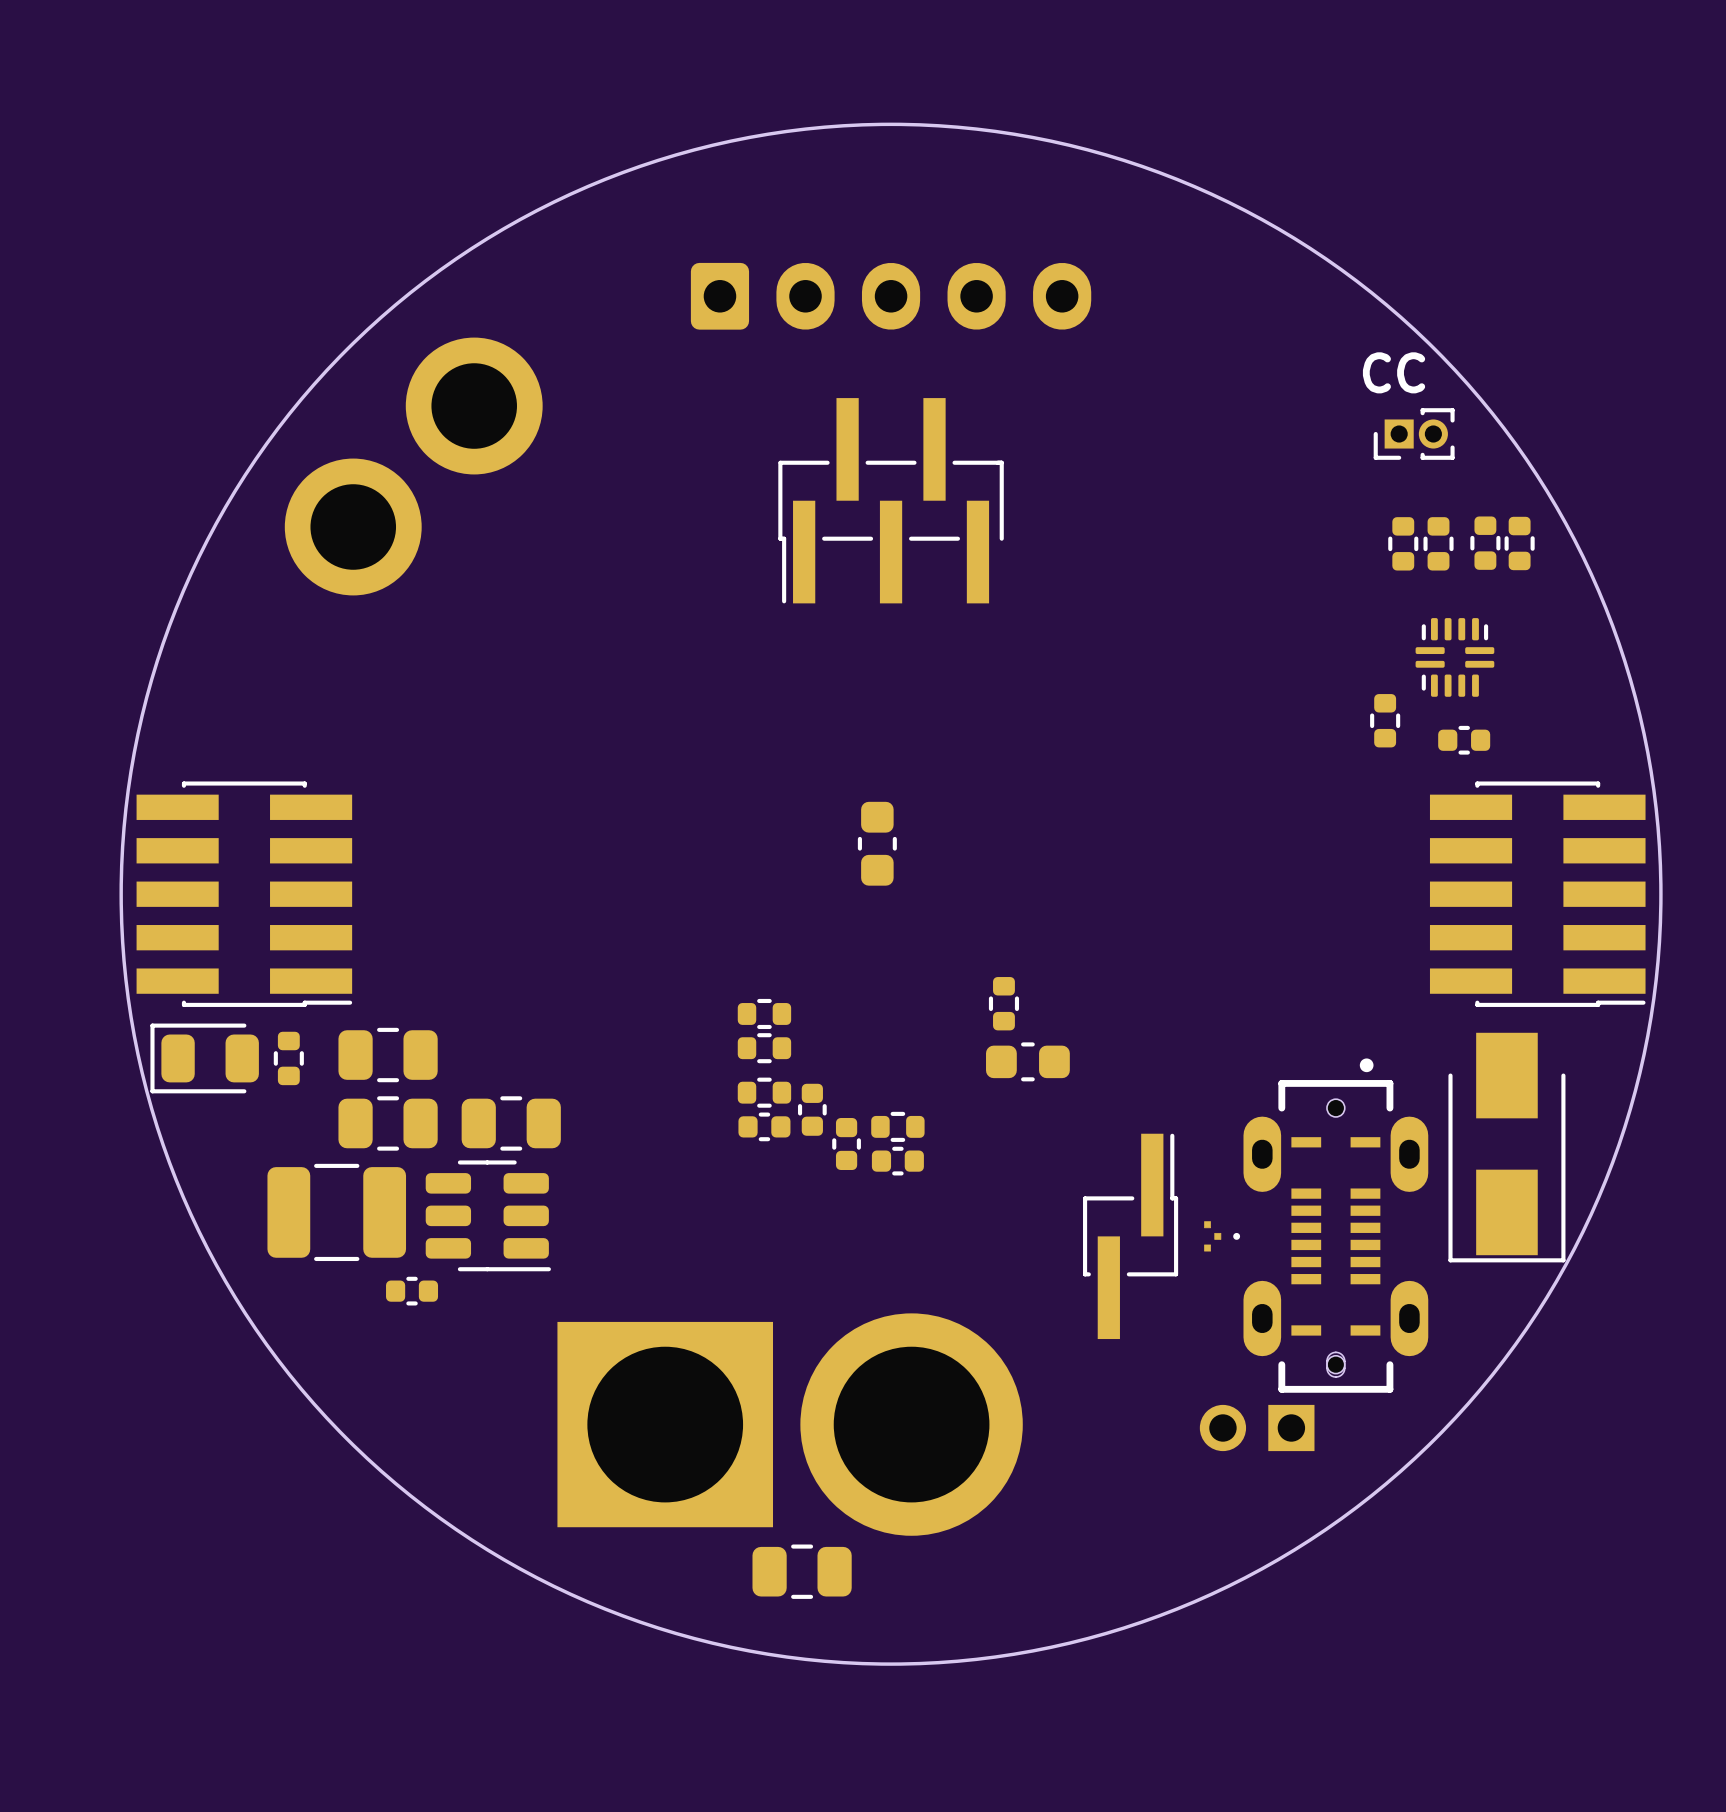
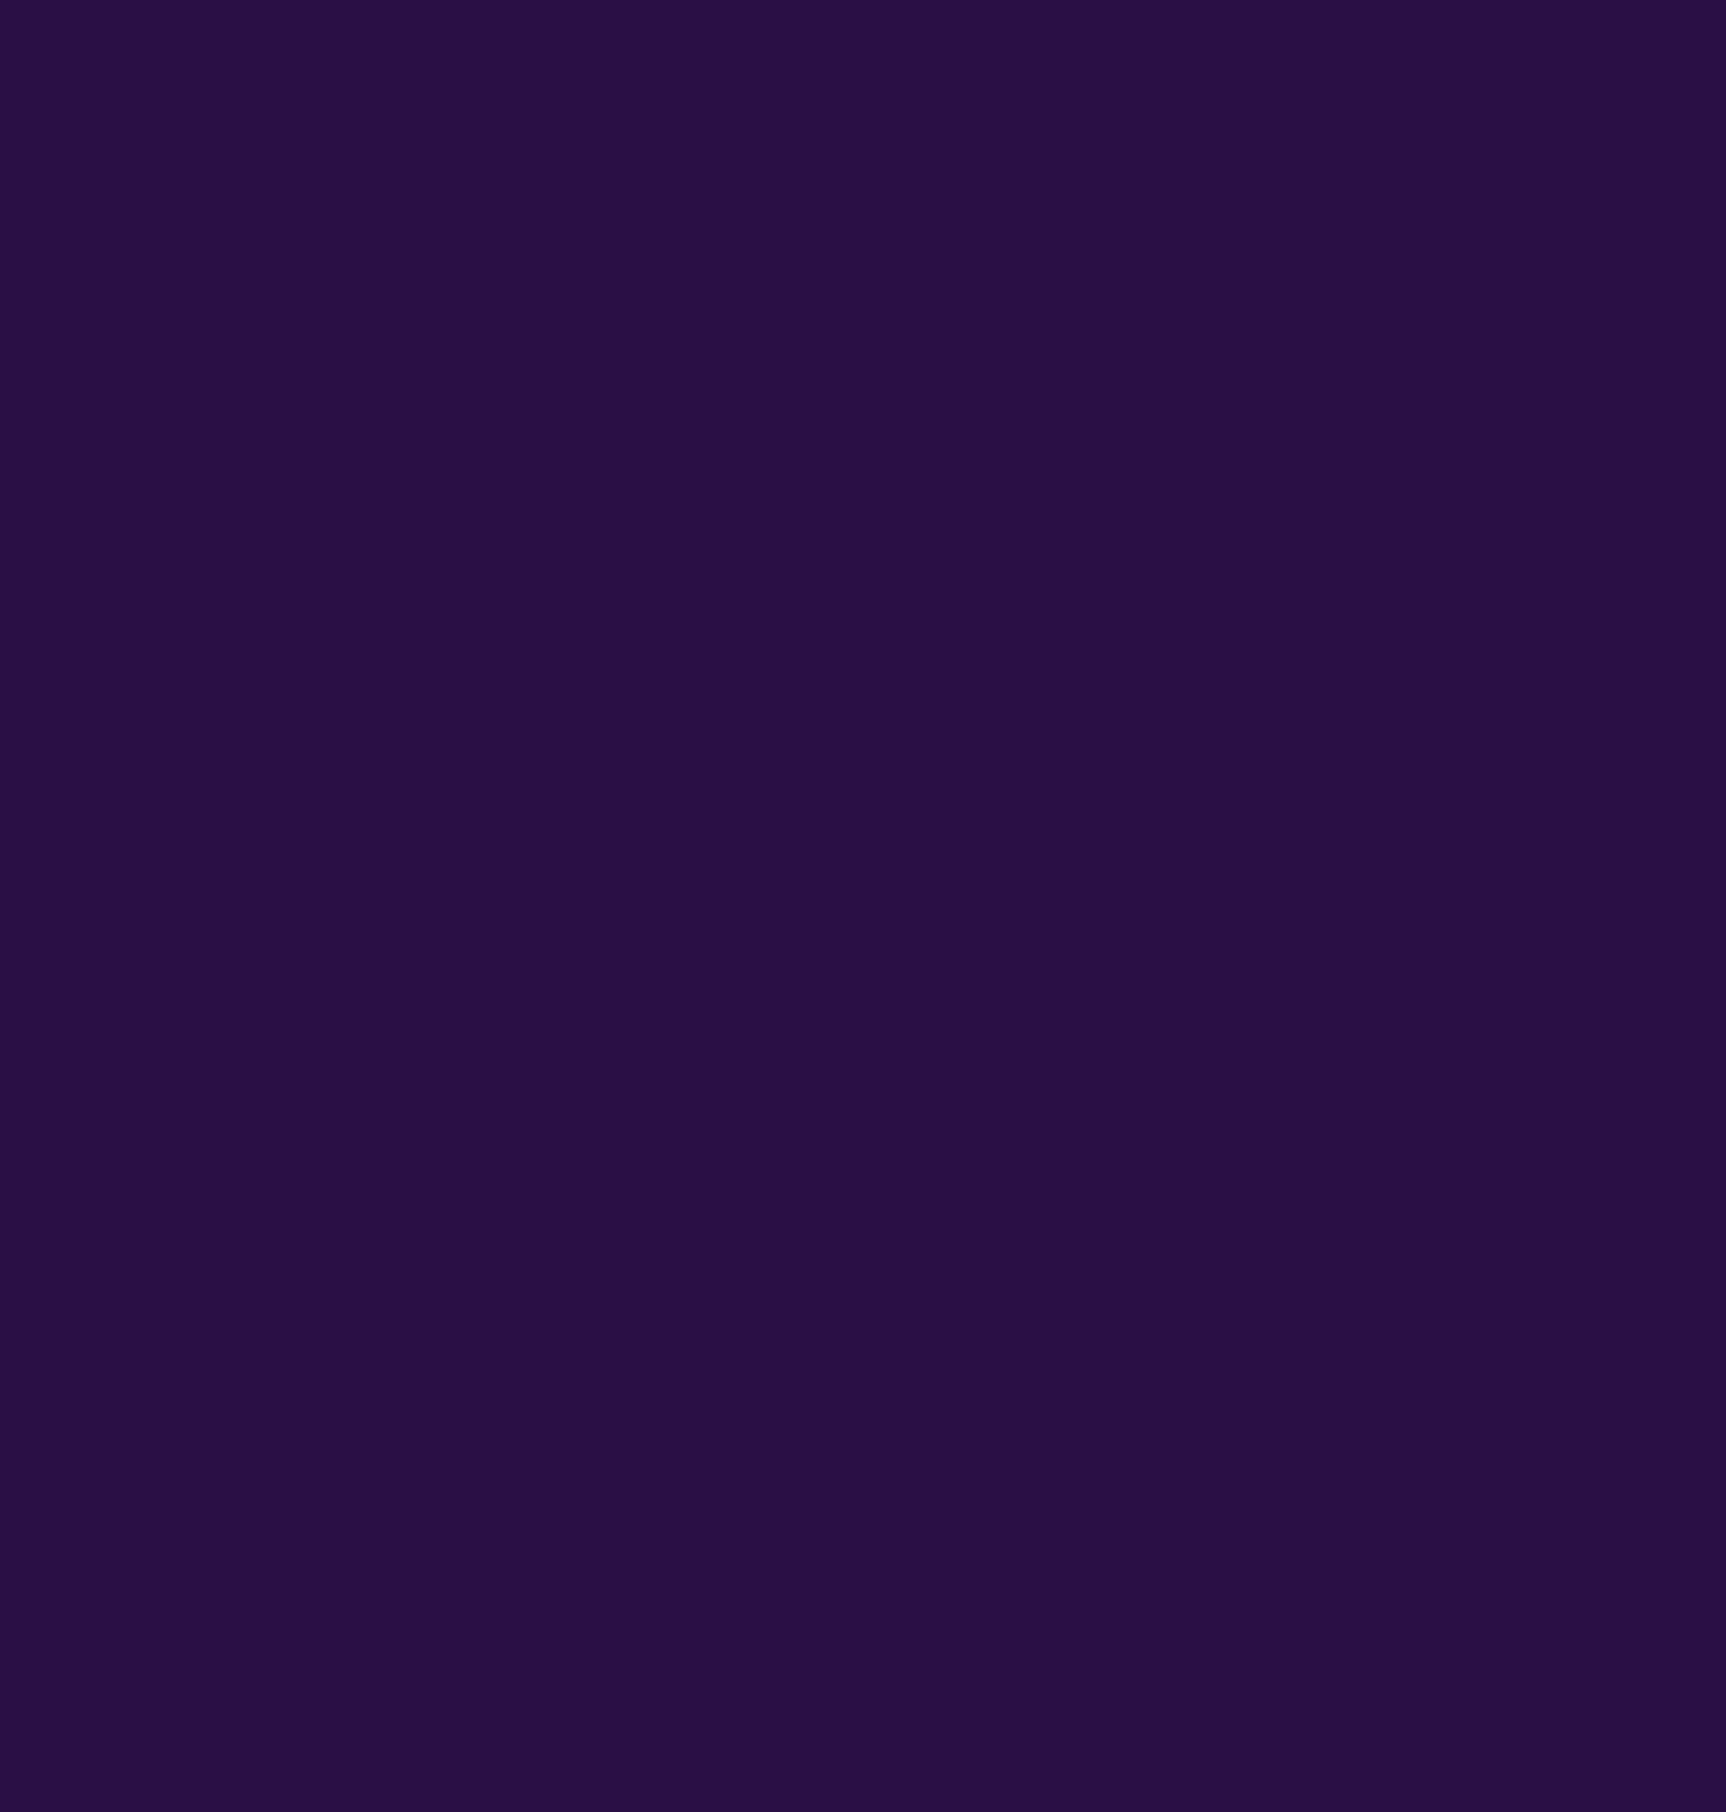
round board edge: [119, 122, 1663, 1666] -> none
part: (891, 296) -> none
text: CC (1394, 372) -> none
part: (1414, 434) -> none
part: (413, 466) -> none
part: (891, 500) -> none
part: (1403, 543) -> none
part: (1438, 543) -> none
part: (1485, 543) -> none
part: (1519, 543) -> none
part: (1454, 657) -> none
part: (1385, 720) -> none
part: (1464, 740) -> none
part: (877, 843) -> none
part: (244, 894) -> none
part: (1537, 894) -> none
part: (1003, 1003) -> none
part: (764, 1013) -> none
part: (764, 1048) -> none
part: (388, 1055) -> none
part: (204, 1058) -> none
part: (288, 1058) -> none
part: (1027, 1061) -> none
part: (764, 1092) -> none
part: (812, 1109) -> none
part: (388, 1123) -> none
part: (511, 1123) -> none
part: (764, 1126) -> none
part: (897, 1126) -> none
part: (846, 1144) -> none
part: (1506, 1147) -> none
part: (897, 1161) -> none
part: (336, 1212) -> none
part: (488, 1215) -> none
part: (1335, 1225) -> none
part: (1130, 1236) -> none
part: (1222, 1236) -> none
part: (412, 1291) -> none
part: (790, 1424) -> none
part: (1257, 1427) -> none
part: (802, 1571) -> none

